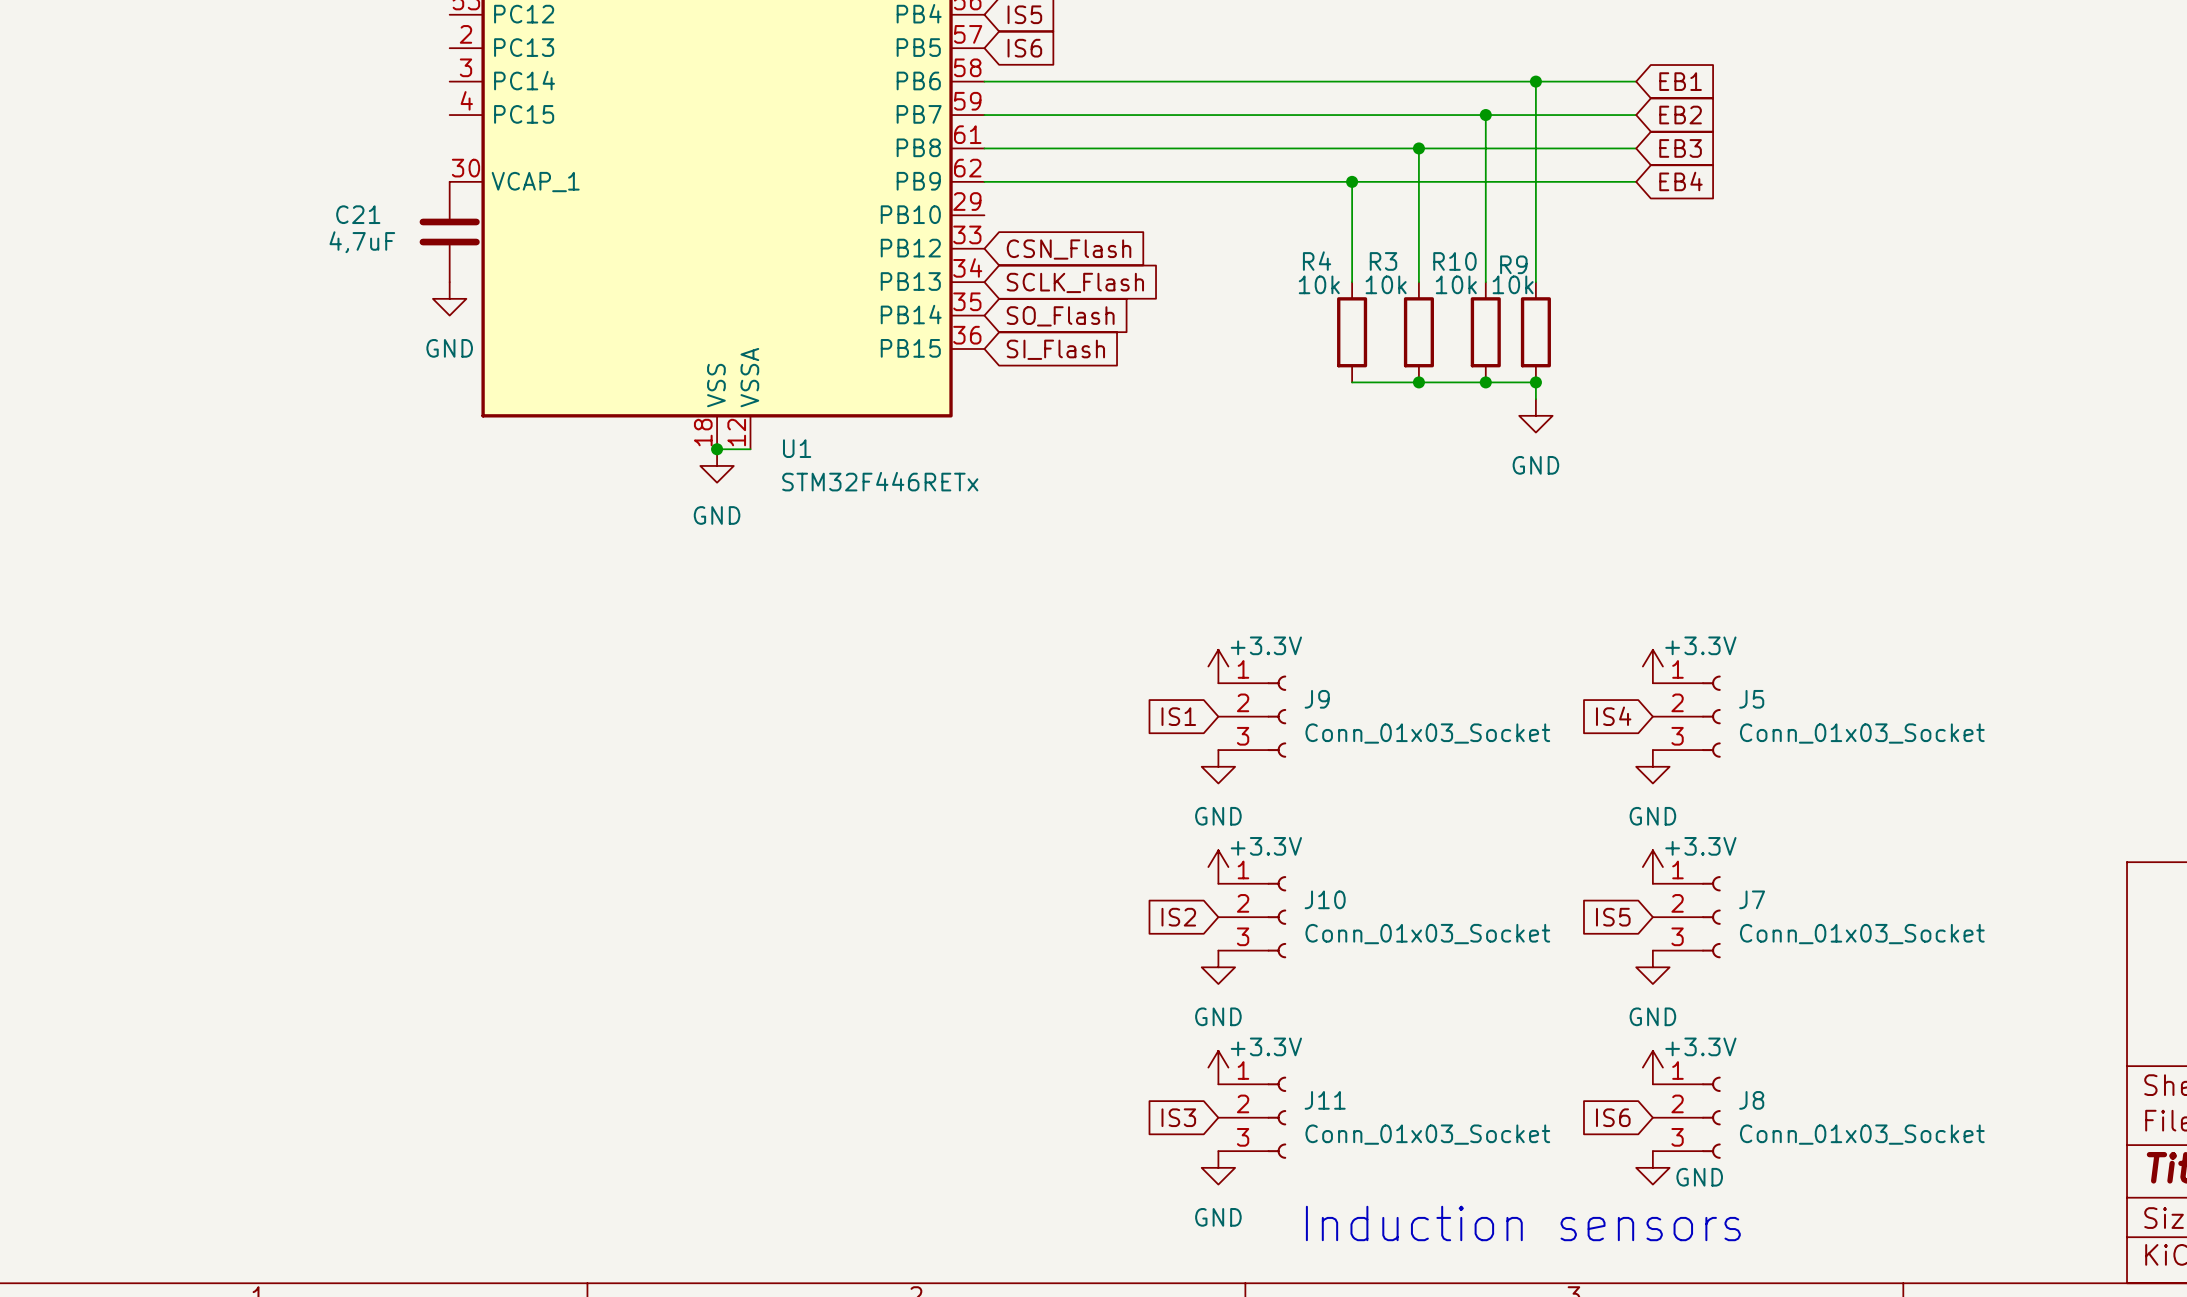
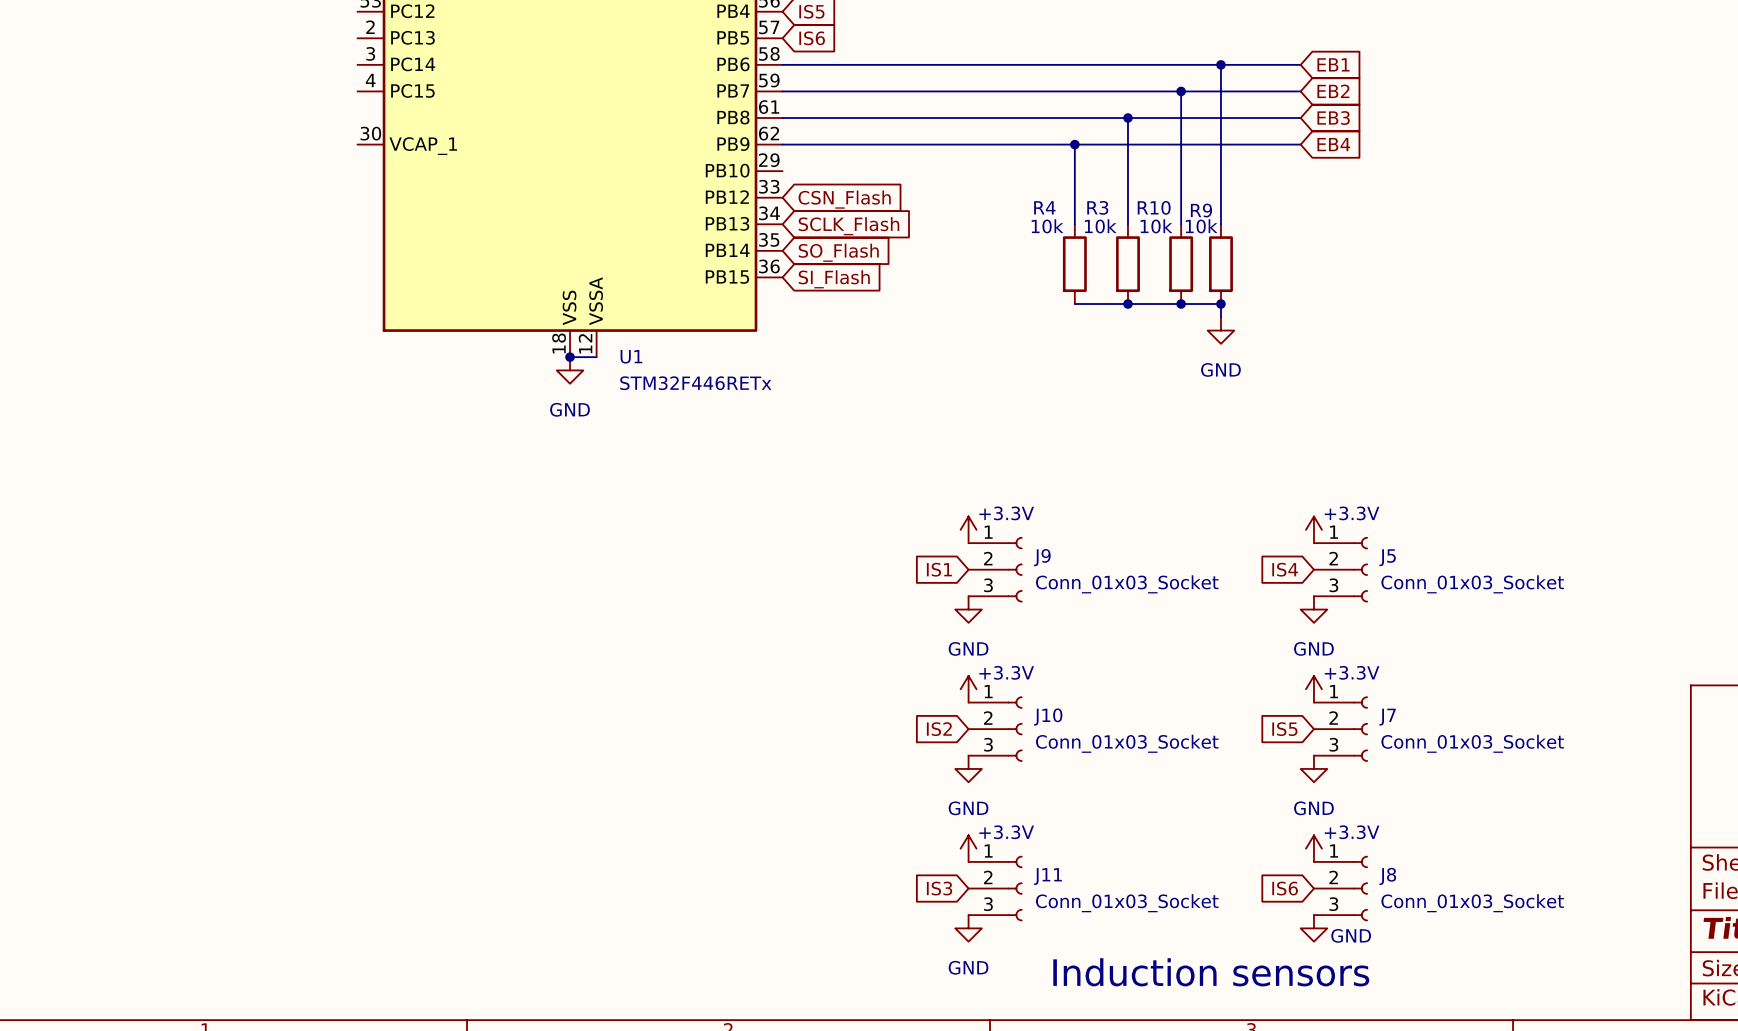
C21: 4,7uF (449, 232) -> none
power symbol: GND (449, 298) -> none

